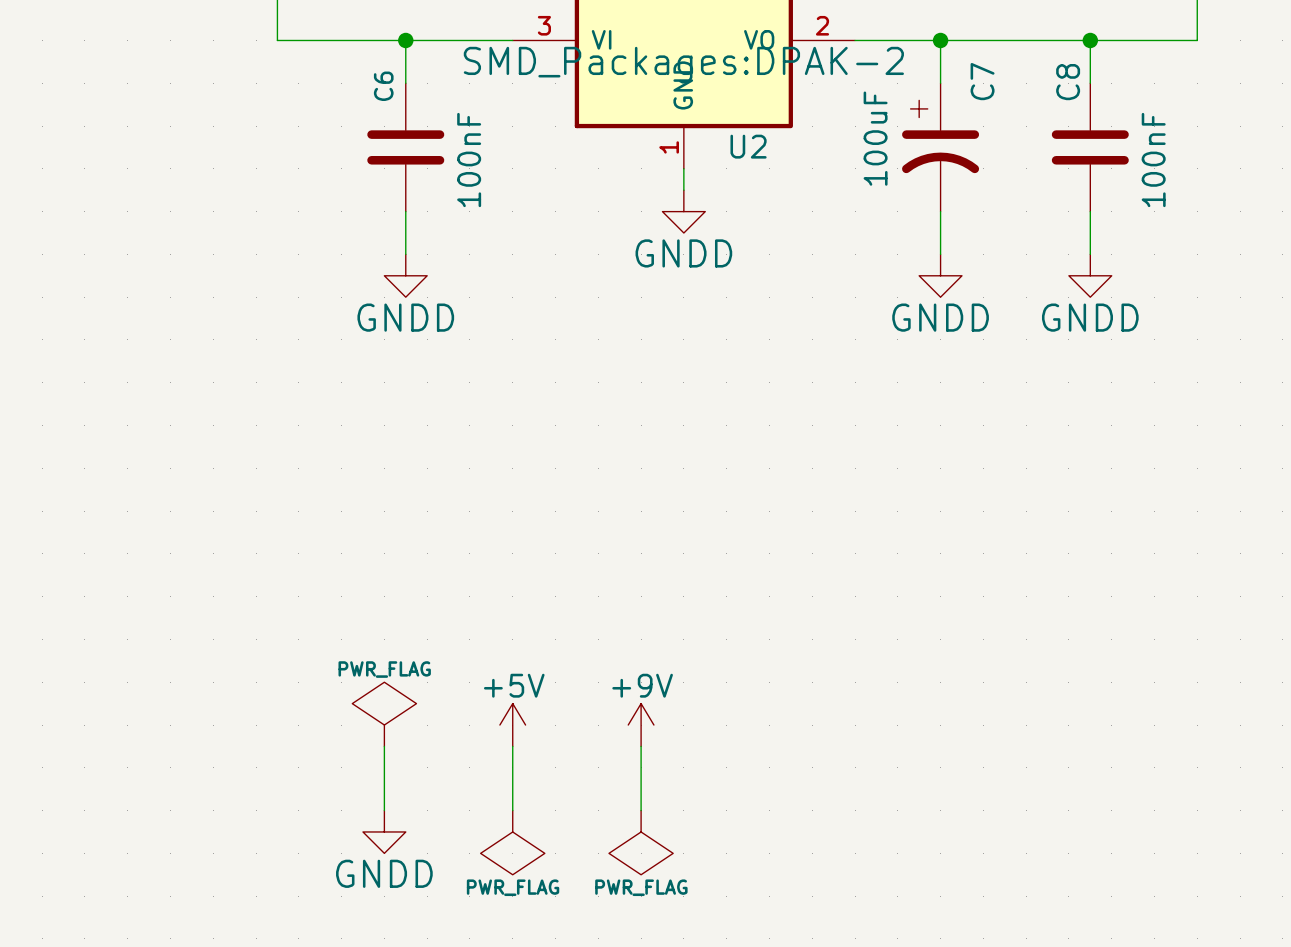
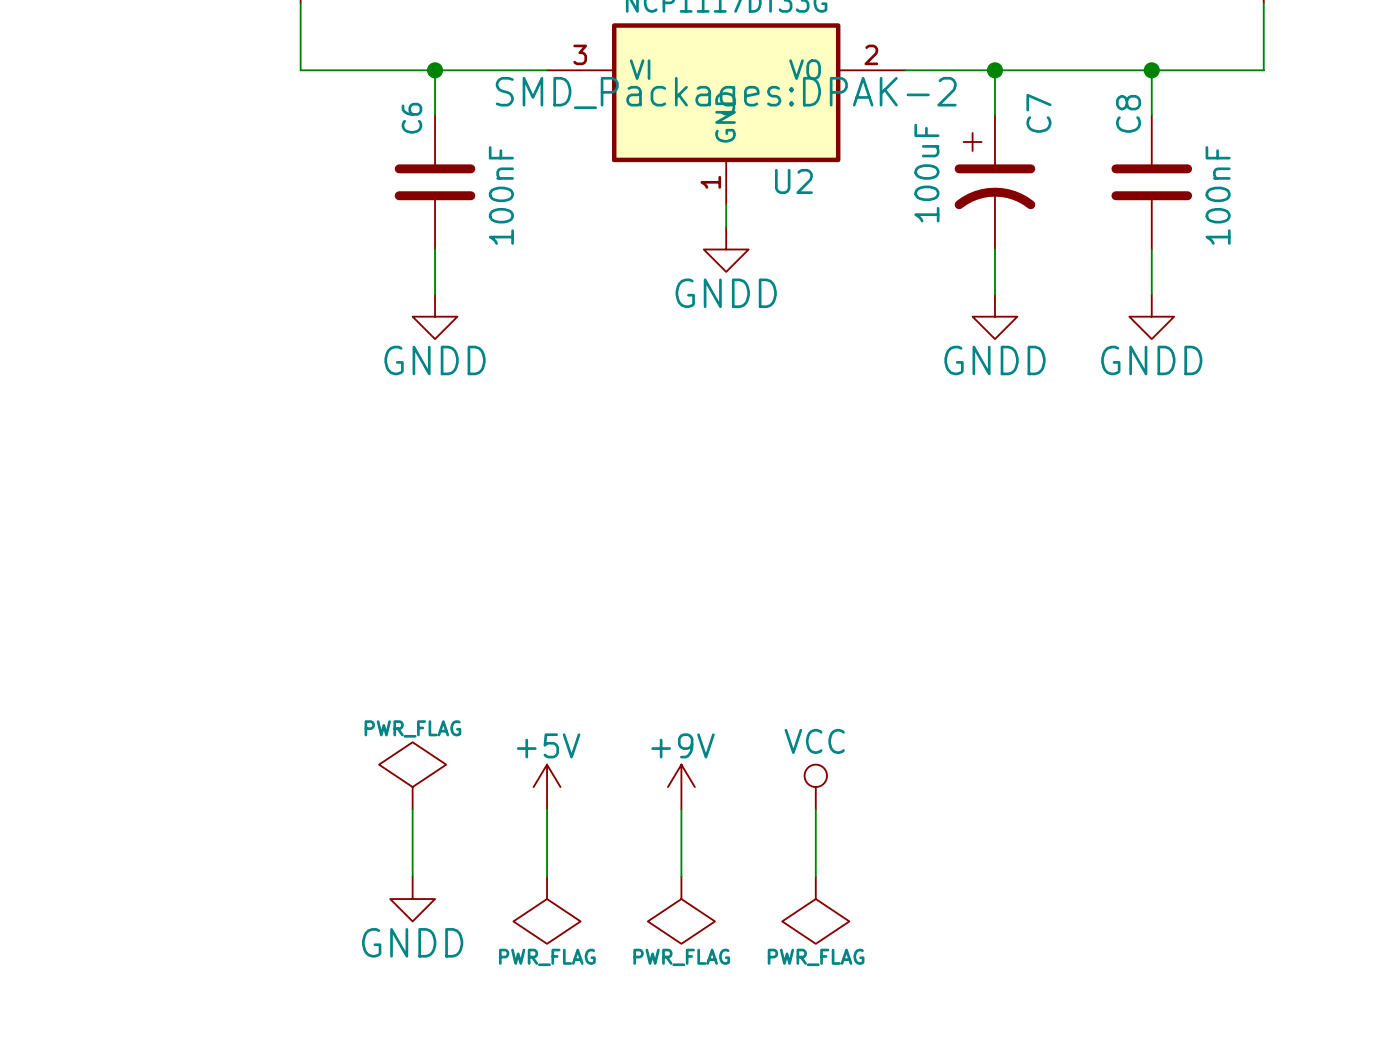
power symbol: none -> VCC (815, 787)
wire: none -> (815, 809) (815, 876)
power symbol: none -> PWR_FLAG (815, 910)

